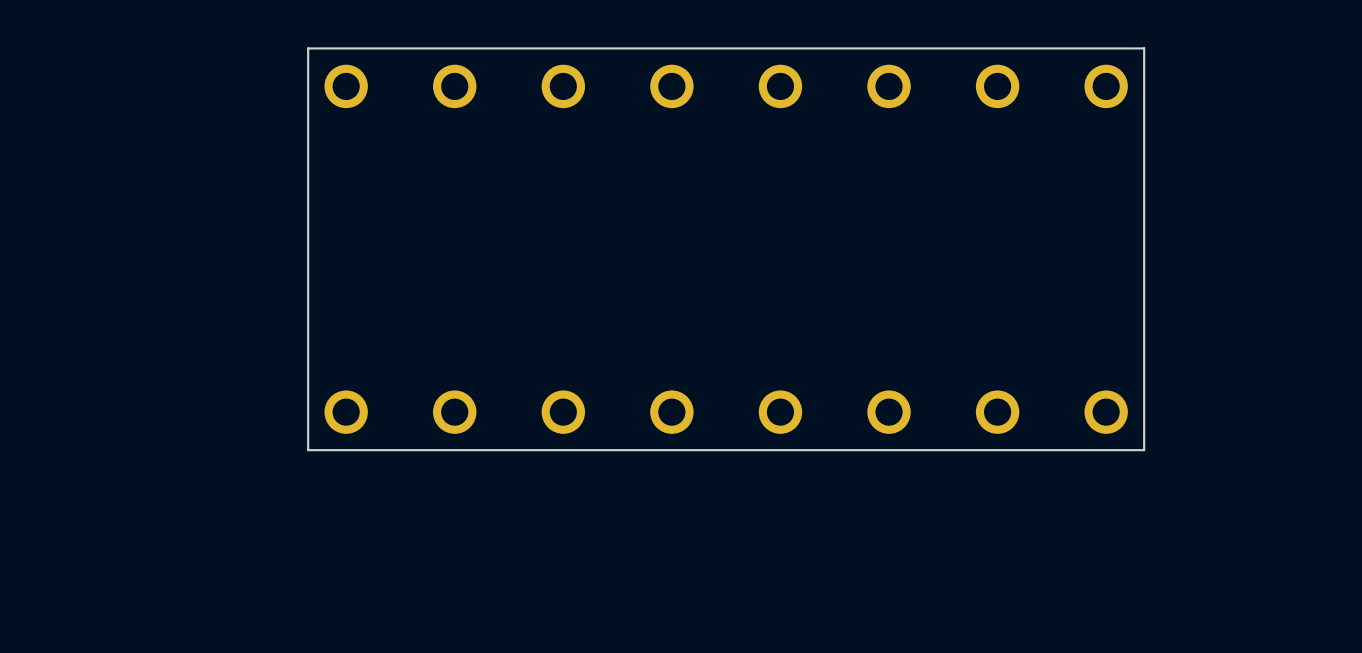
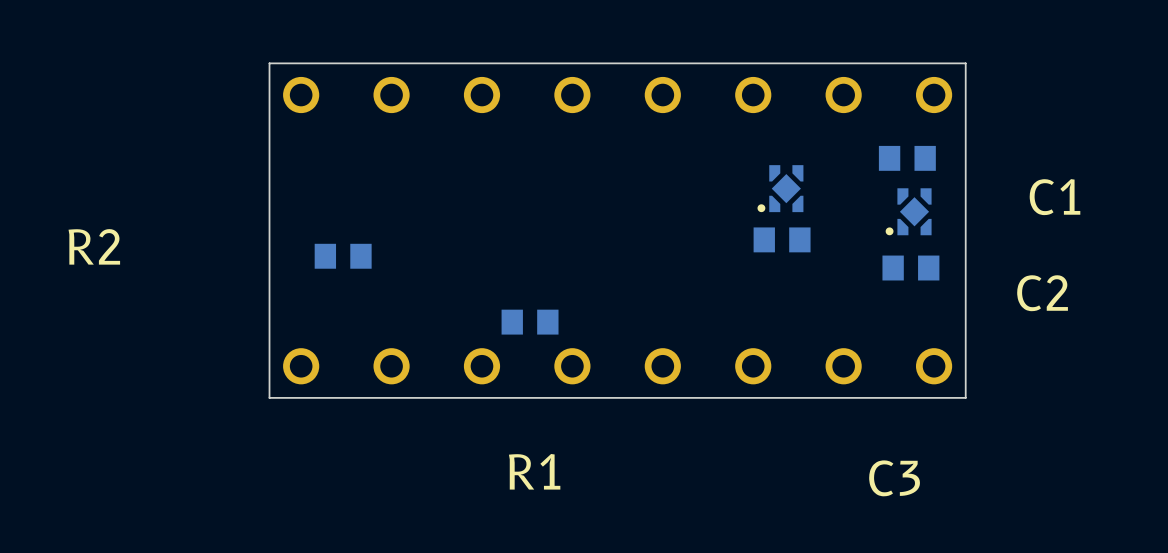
C1: none -> (907, 158)
part: none -> (780, 188)
part: none -> (908, 211)
C3: none -> (782, 239)
R2: none -> (343, 256)
C2: none -> (910, 268)
R1: none -> (530, 322)

